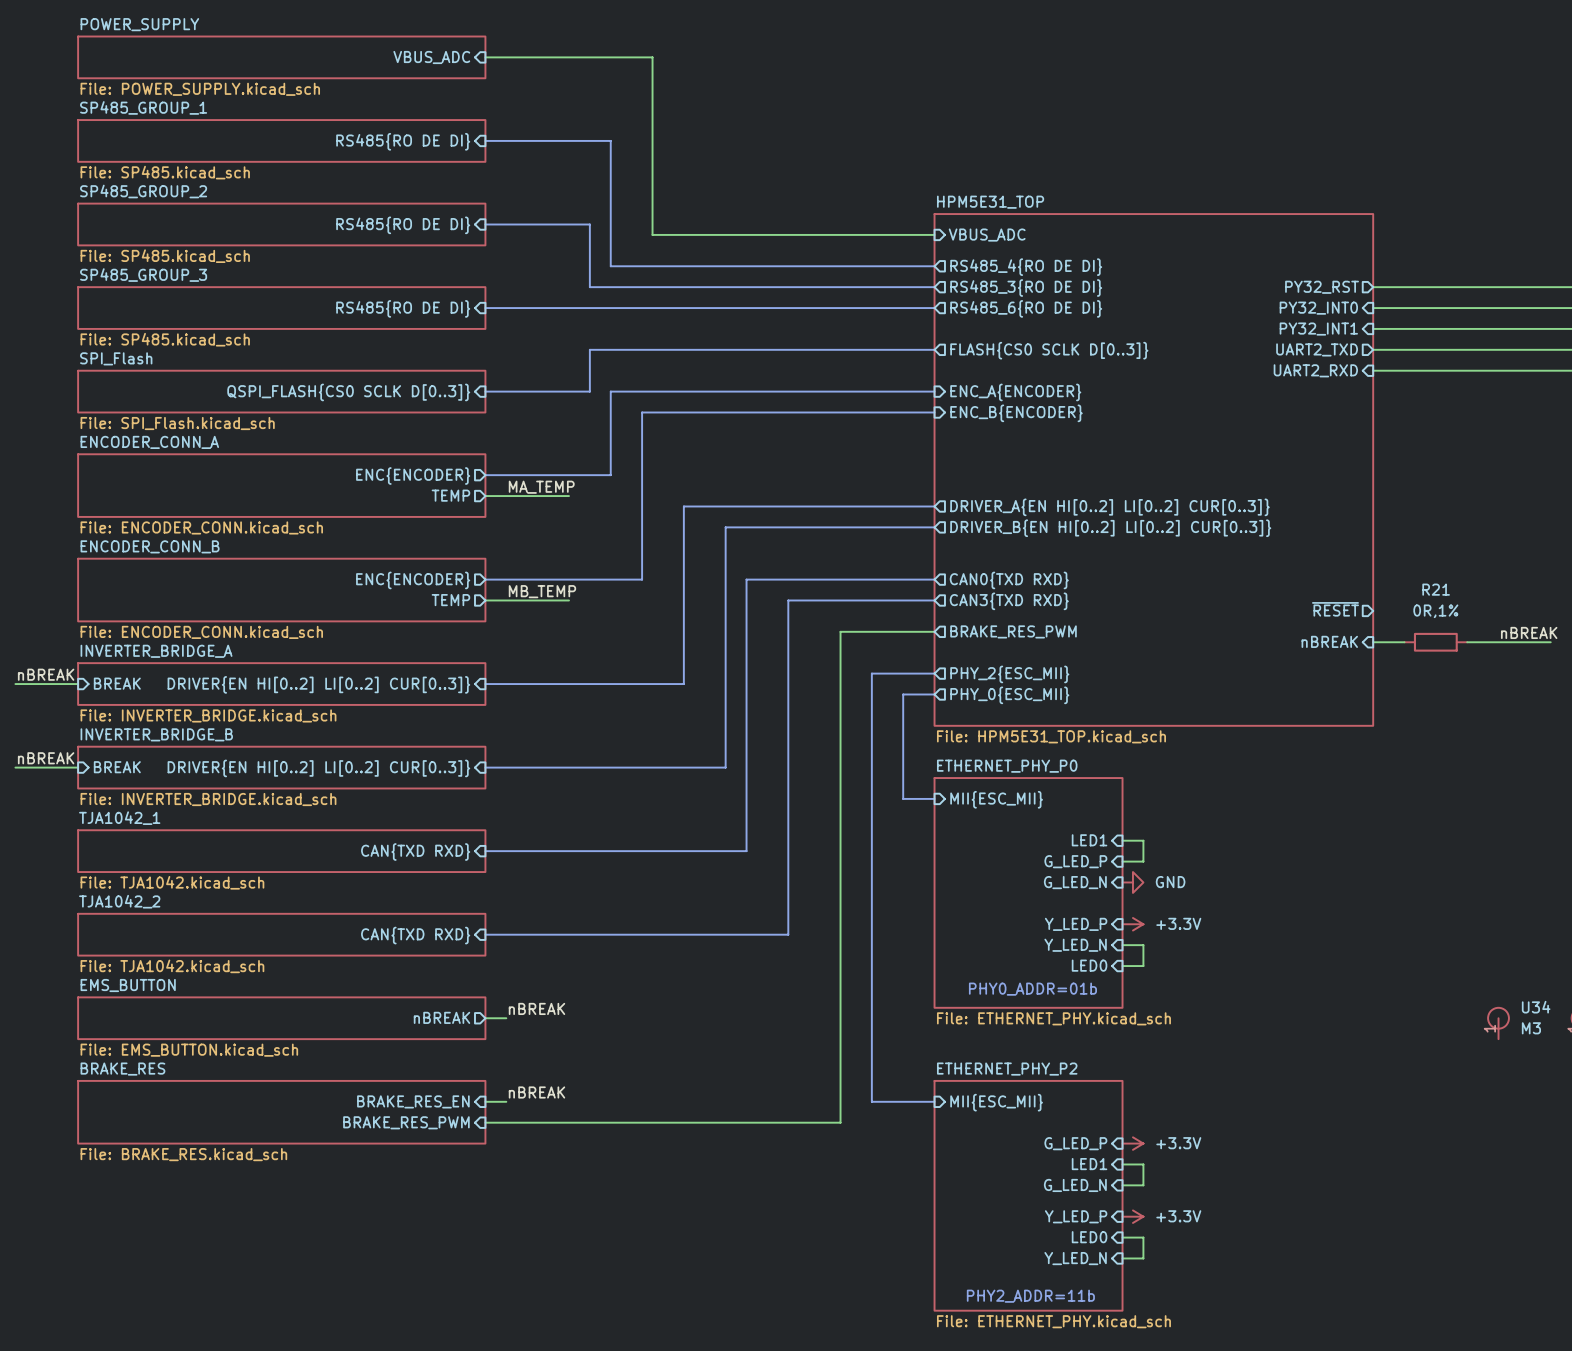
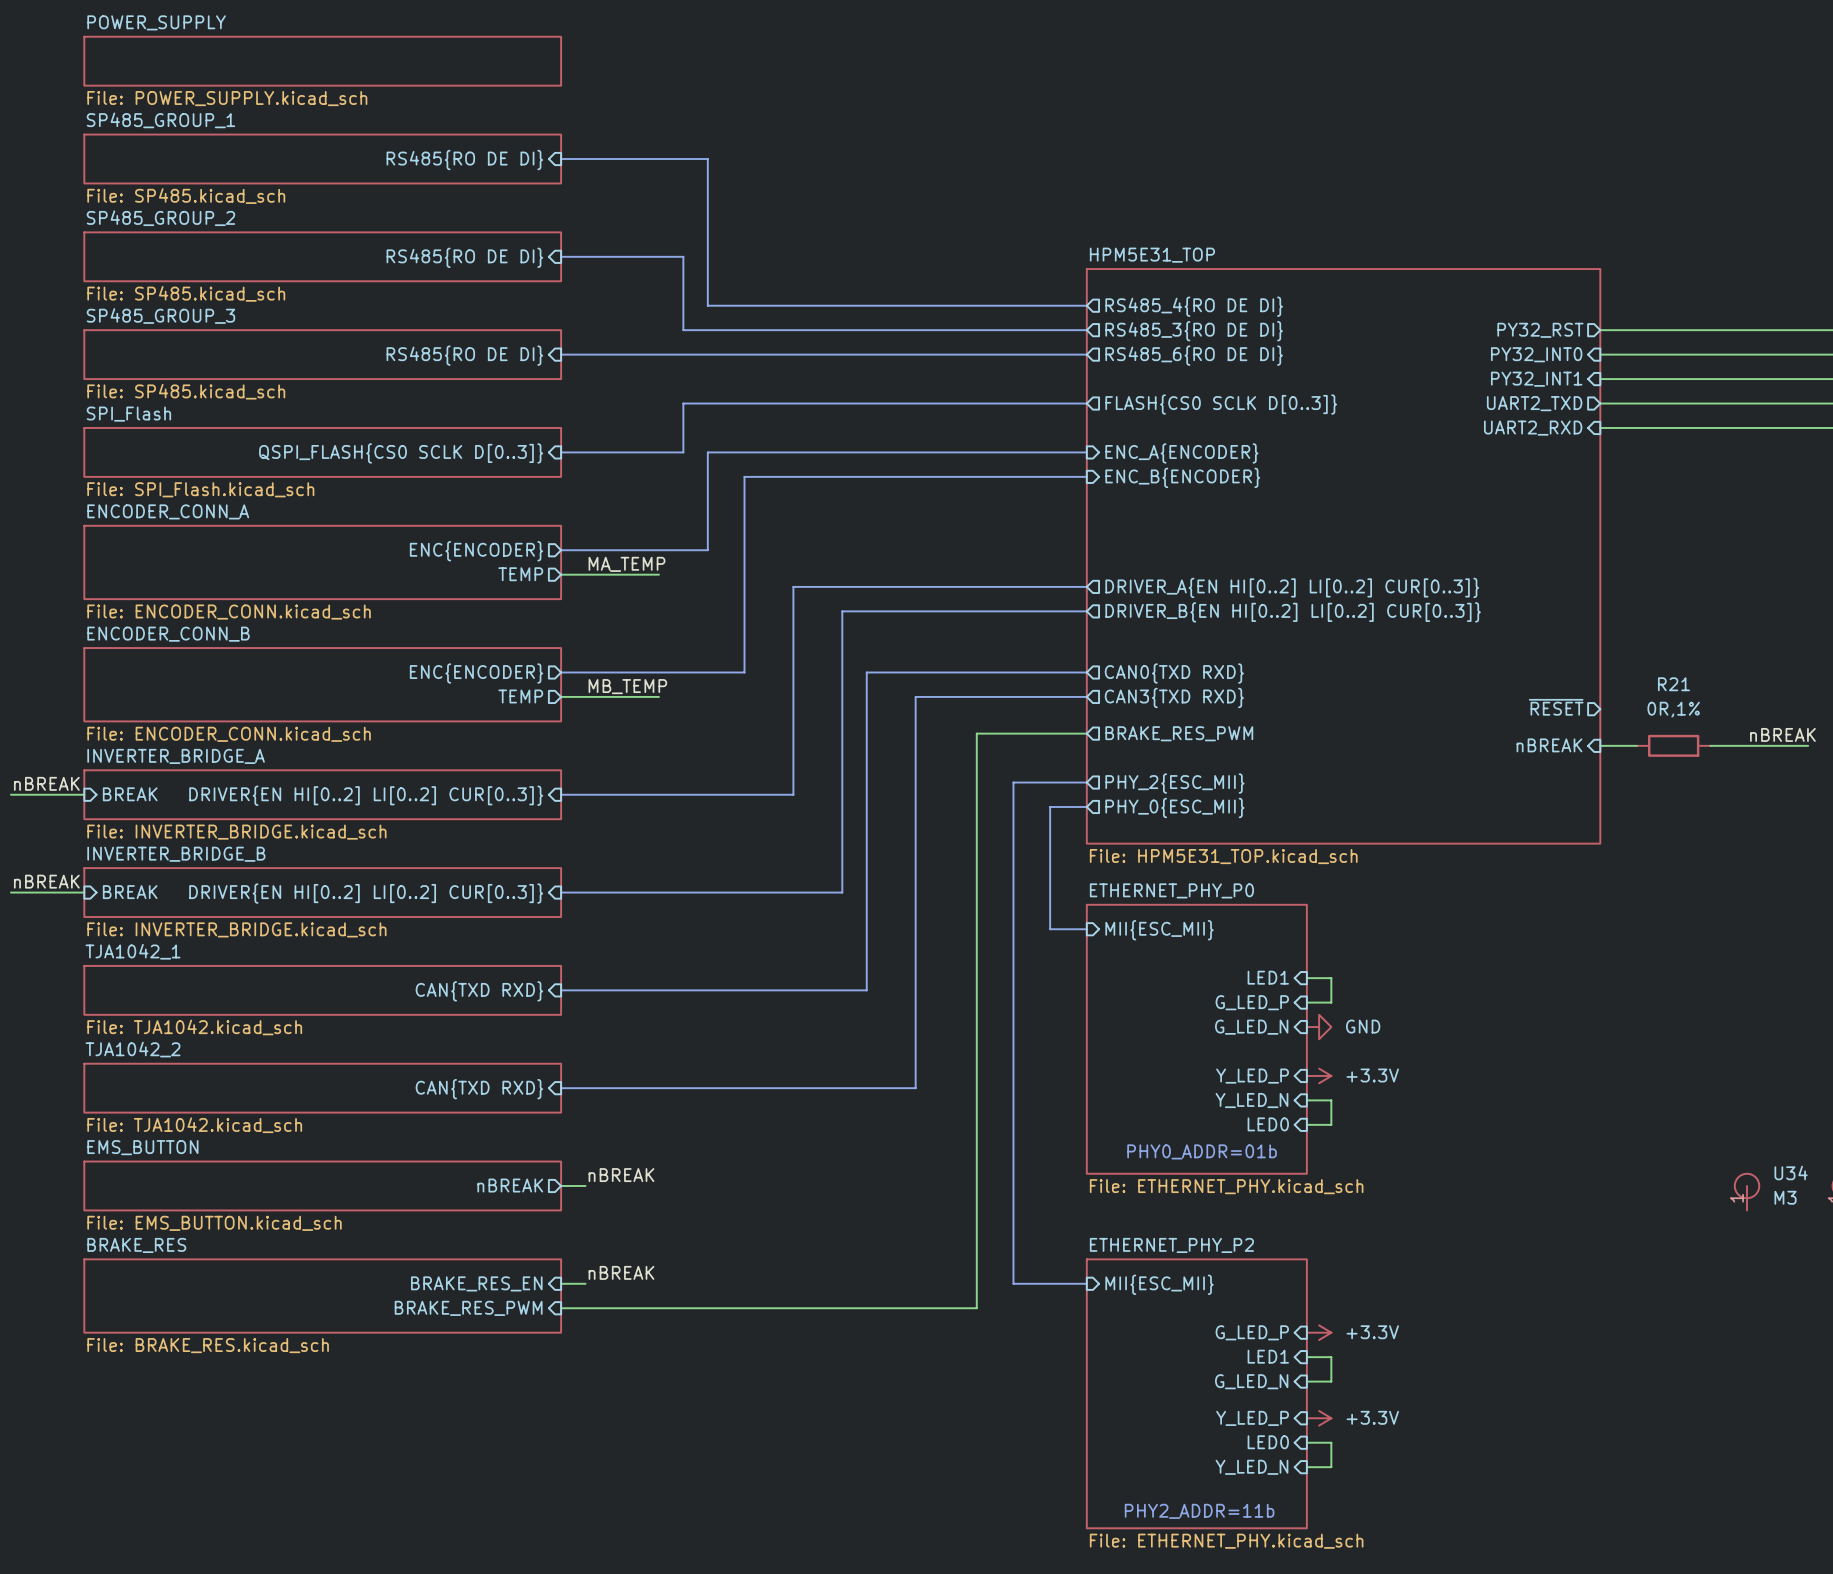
sheet pin: VBUS_ADC (431, 57) -> none
wire: (485, 57) (652, 57) (652, 234) (934, 234) -> none
sheet HPM5E31_TOP shape: [933, 213, 1374, 727] -> [1086, 268, 1602, 845]
sheet pin: VBUS_ADC (987, 235) -> none

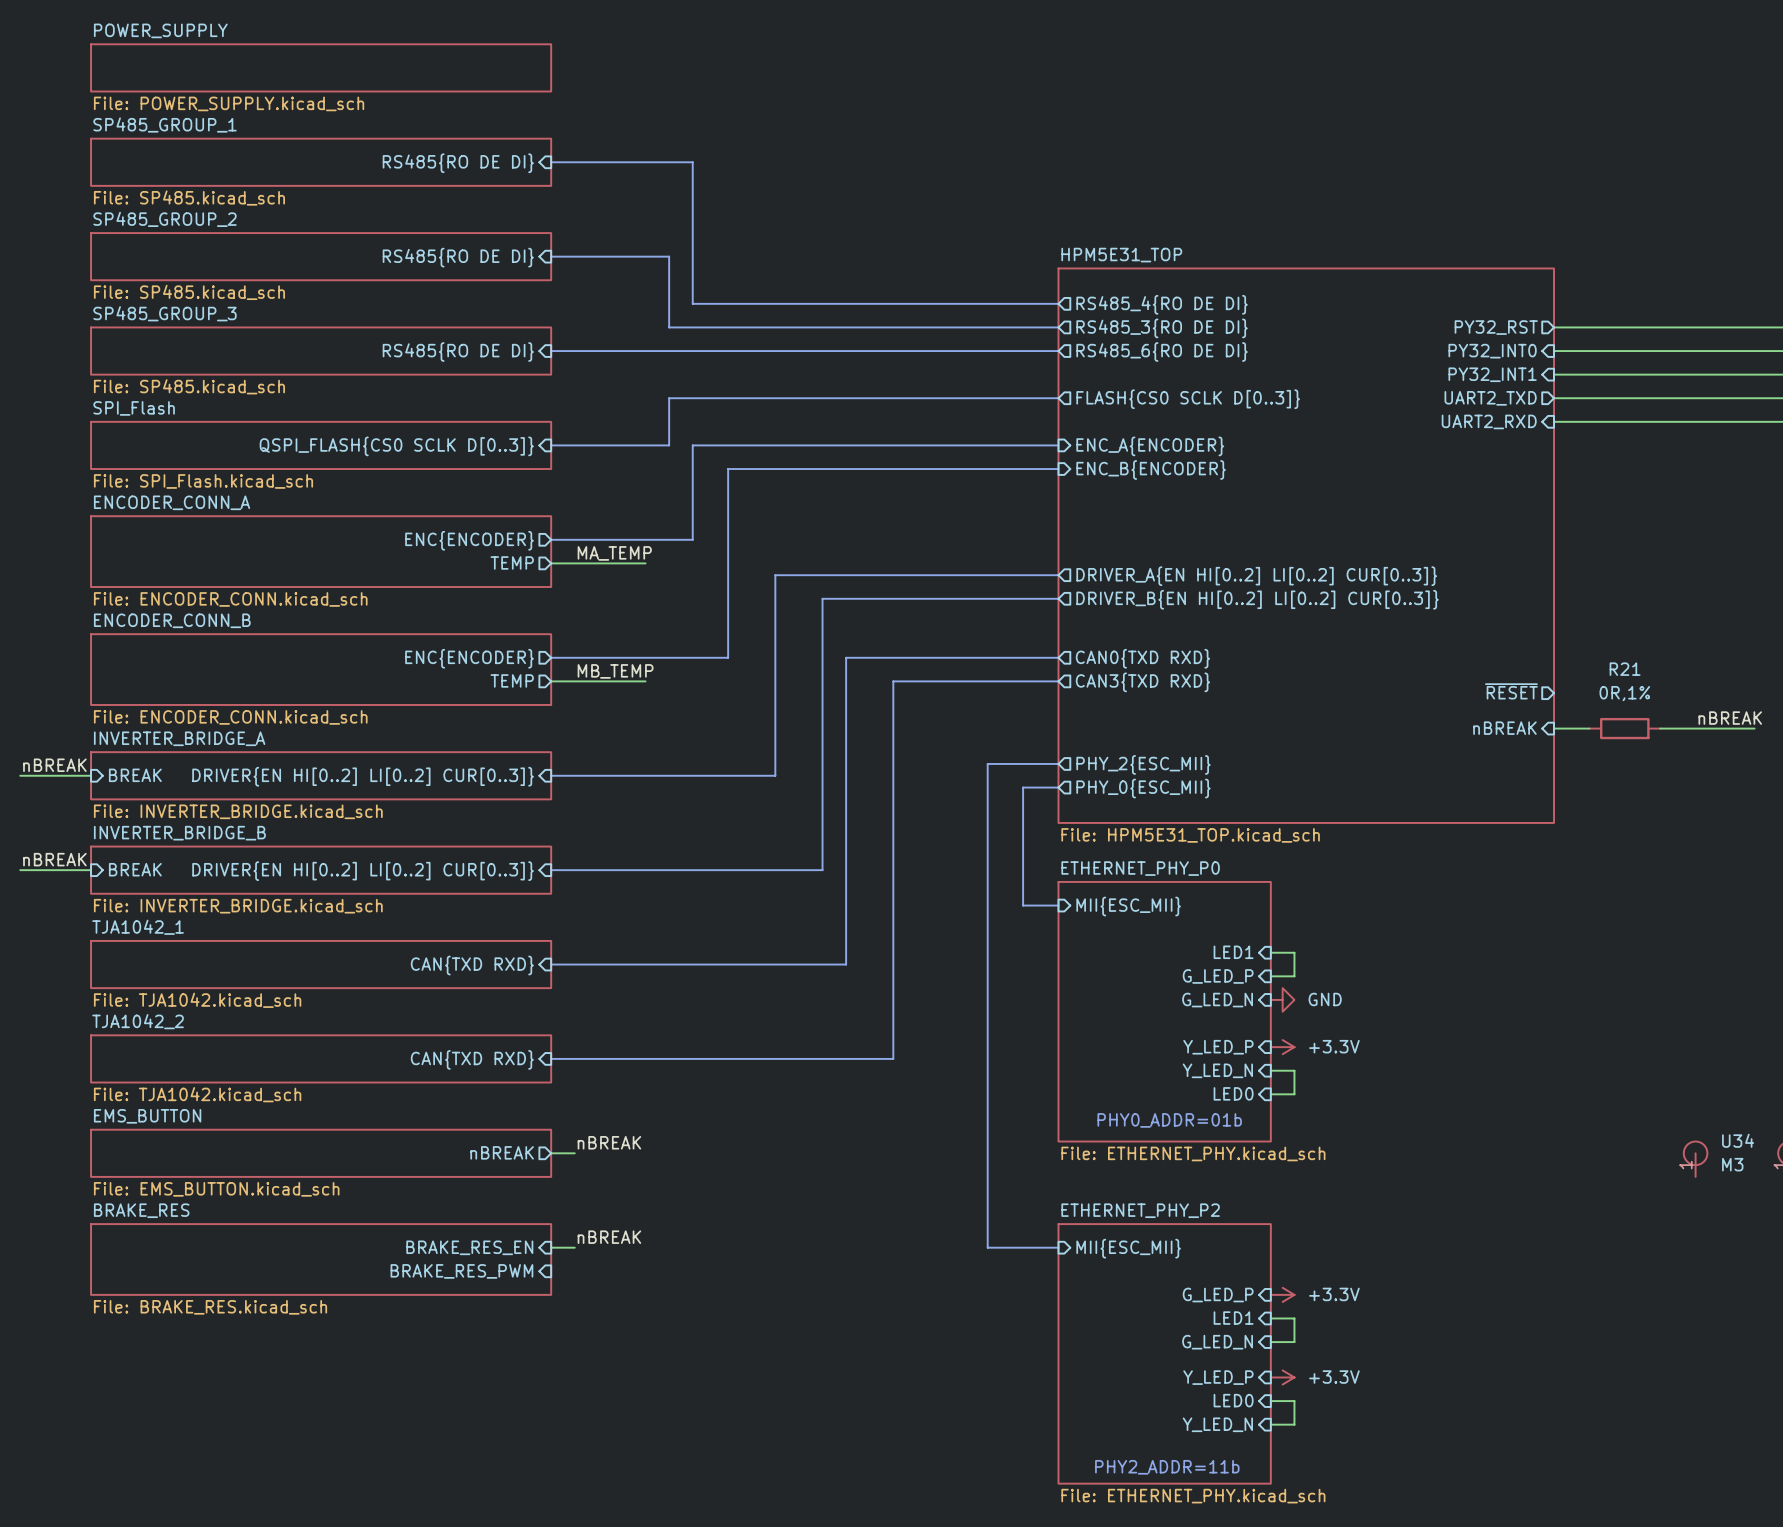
wire: (1086, 733) (976, 733) (976, 1308) (561, 1308) -> none
sheet pin: BRAKE_RES_PWM (1179, 733) -> none

